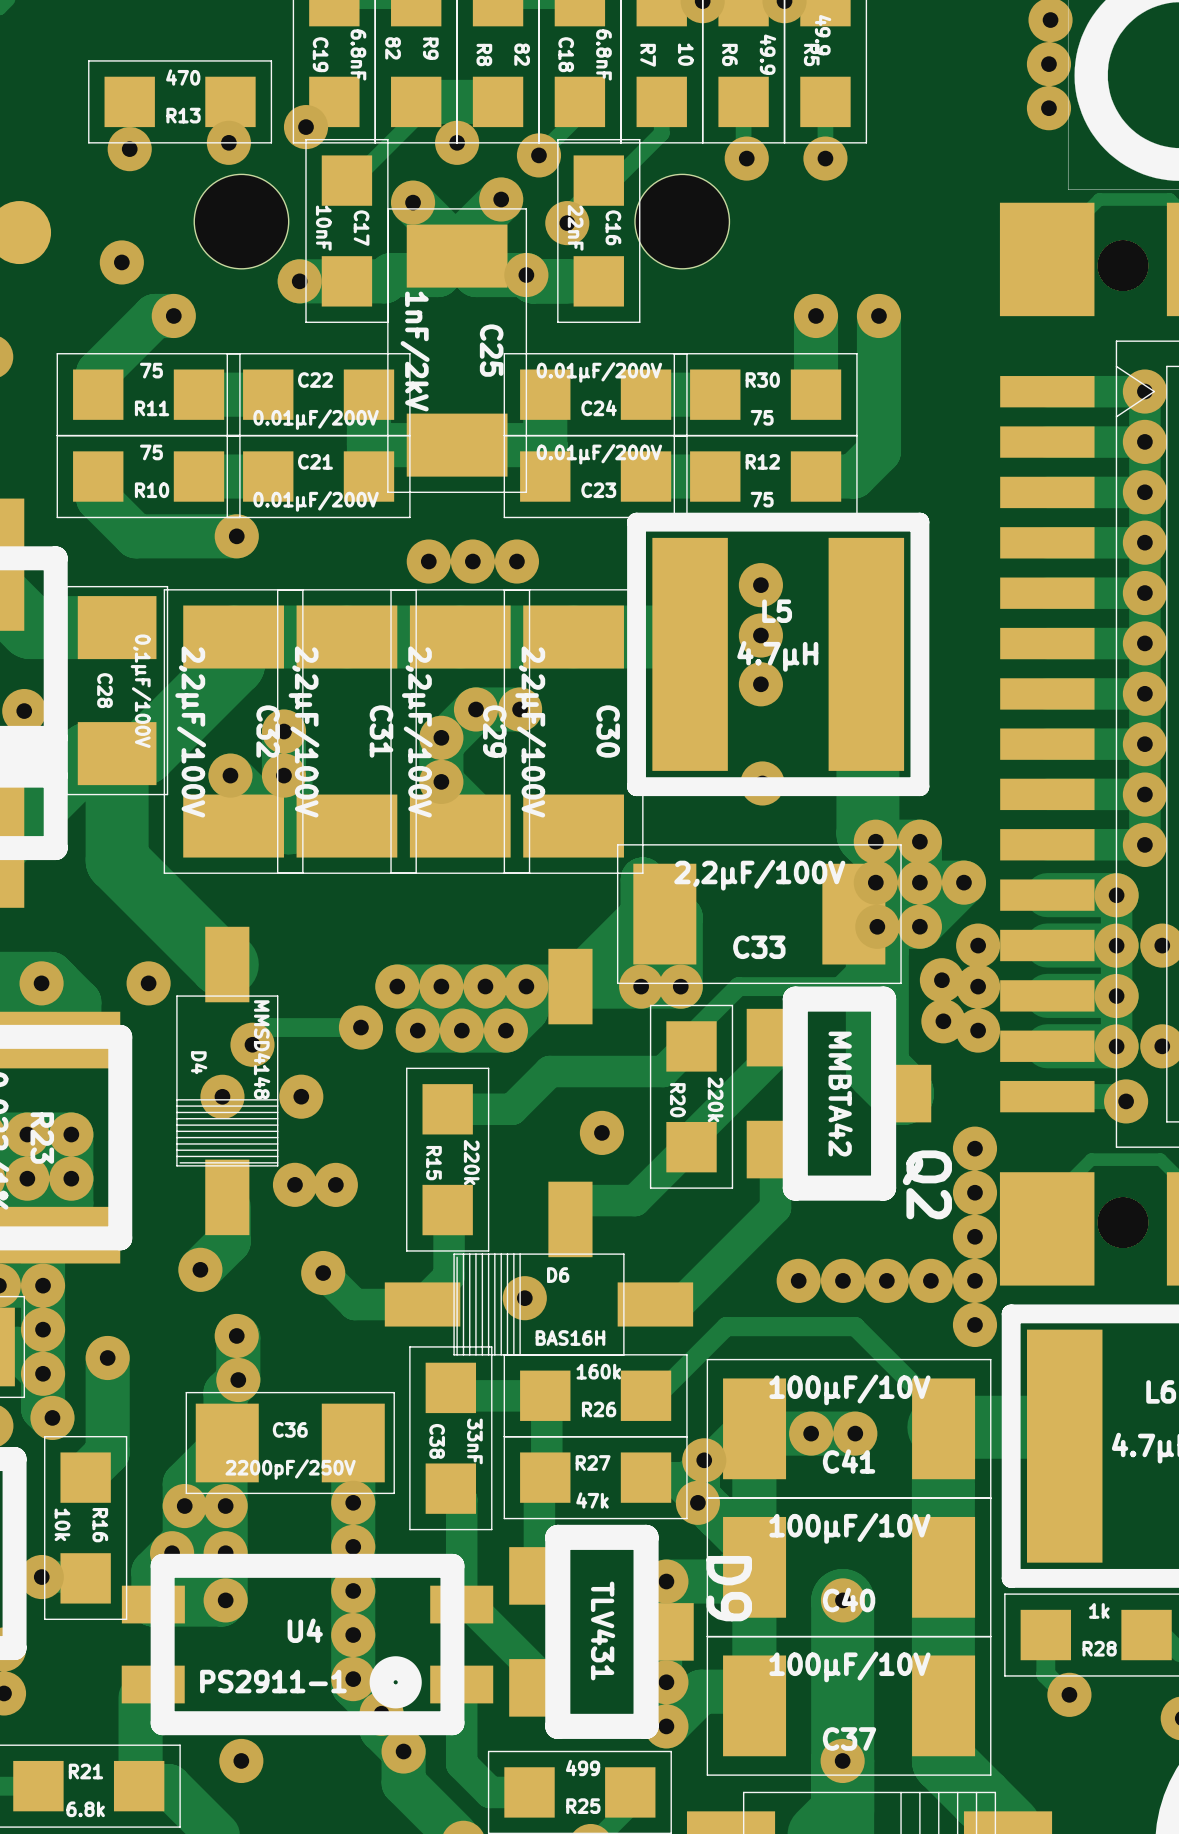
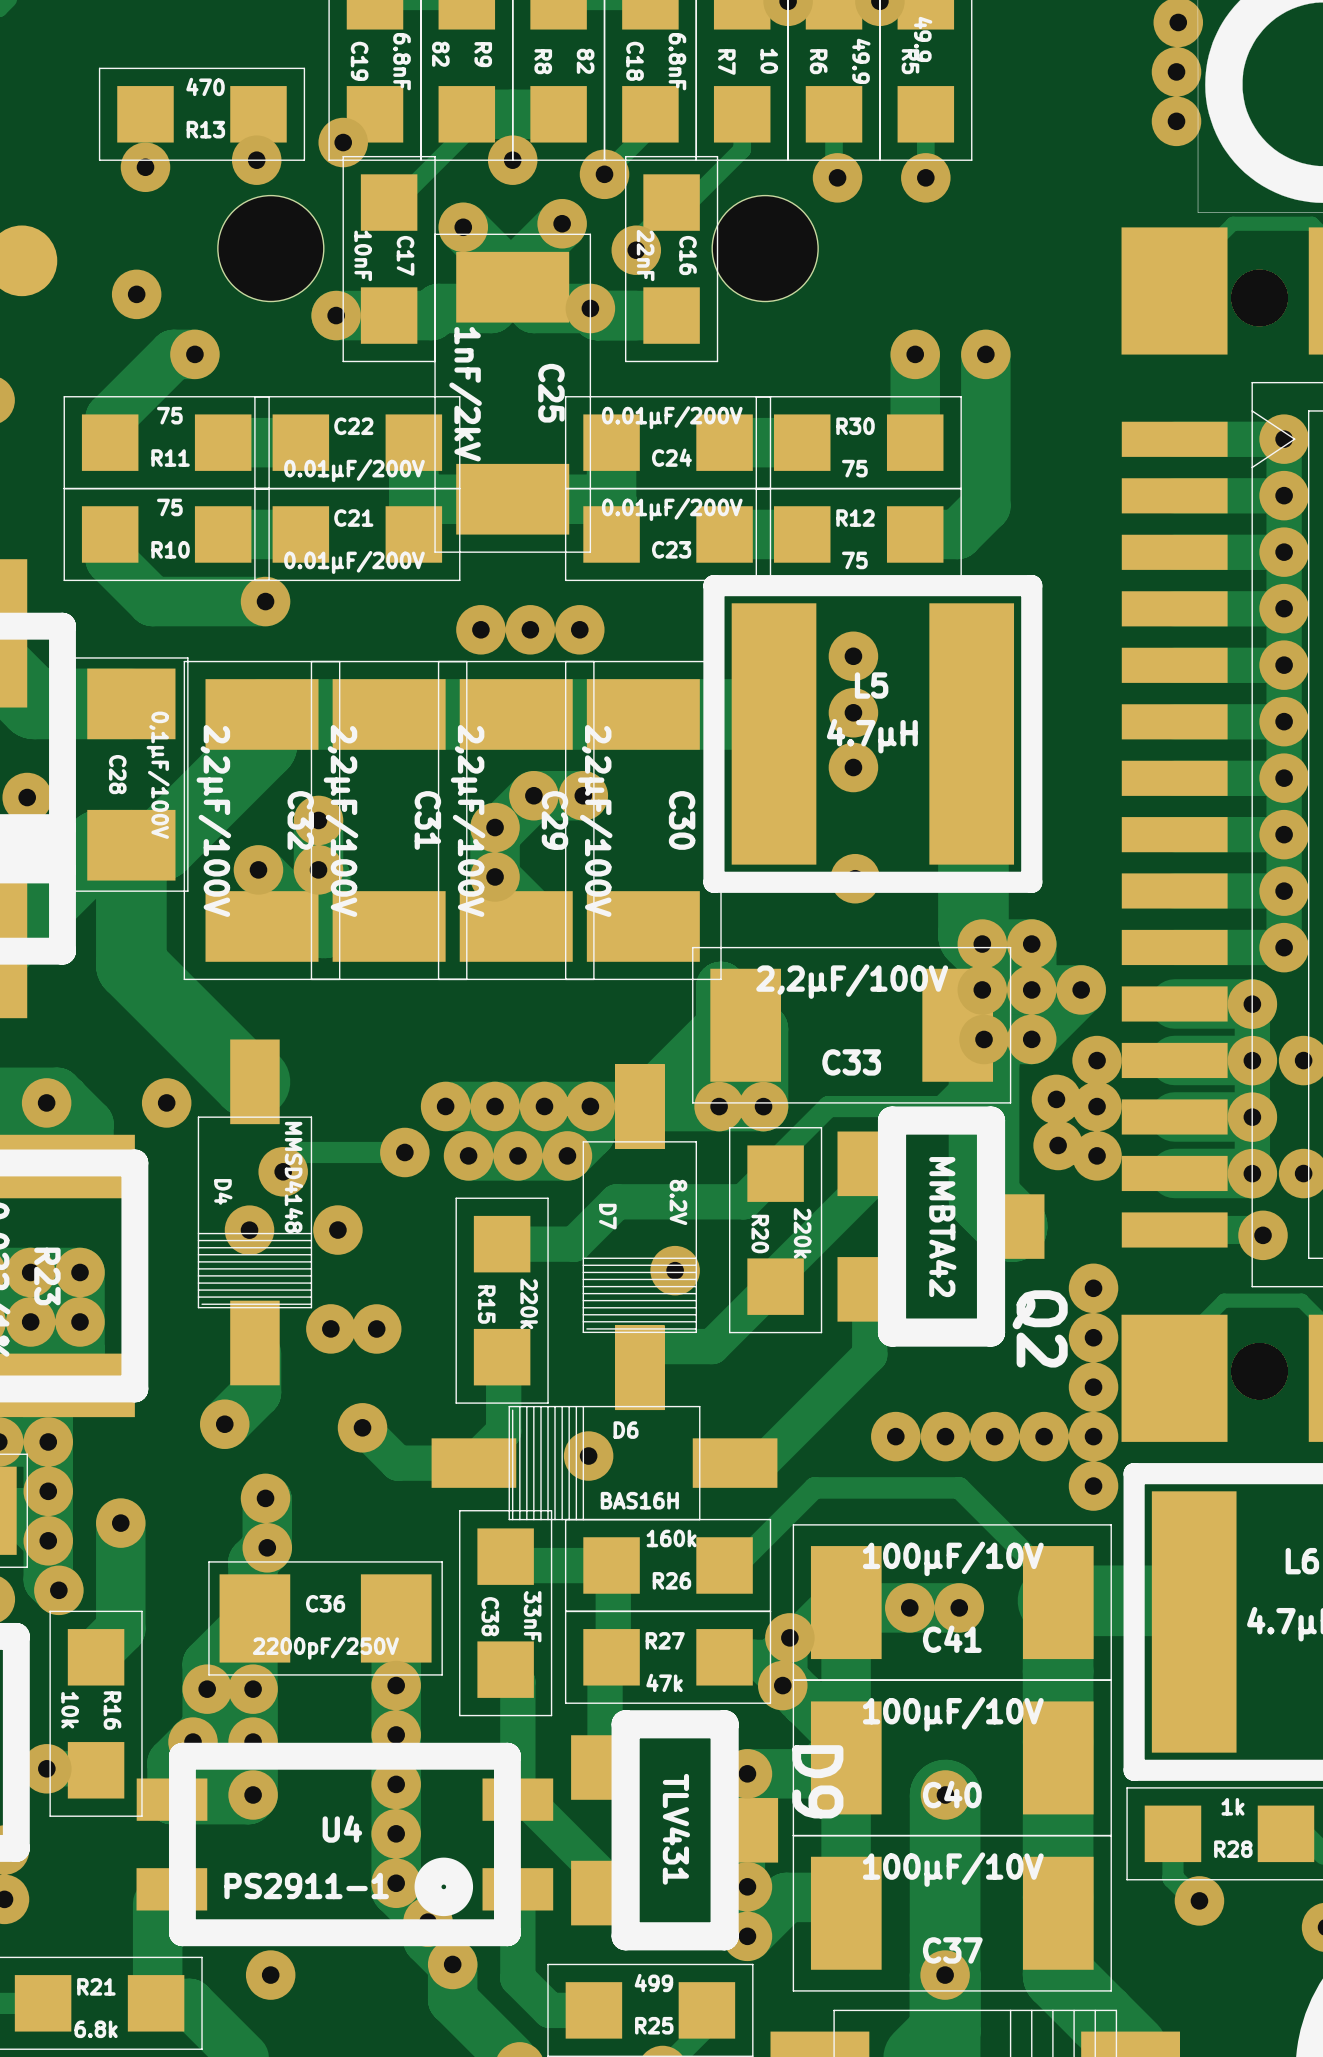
D7: none -> 8.2V (639, 1237)

